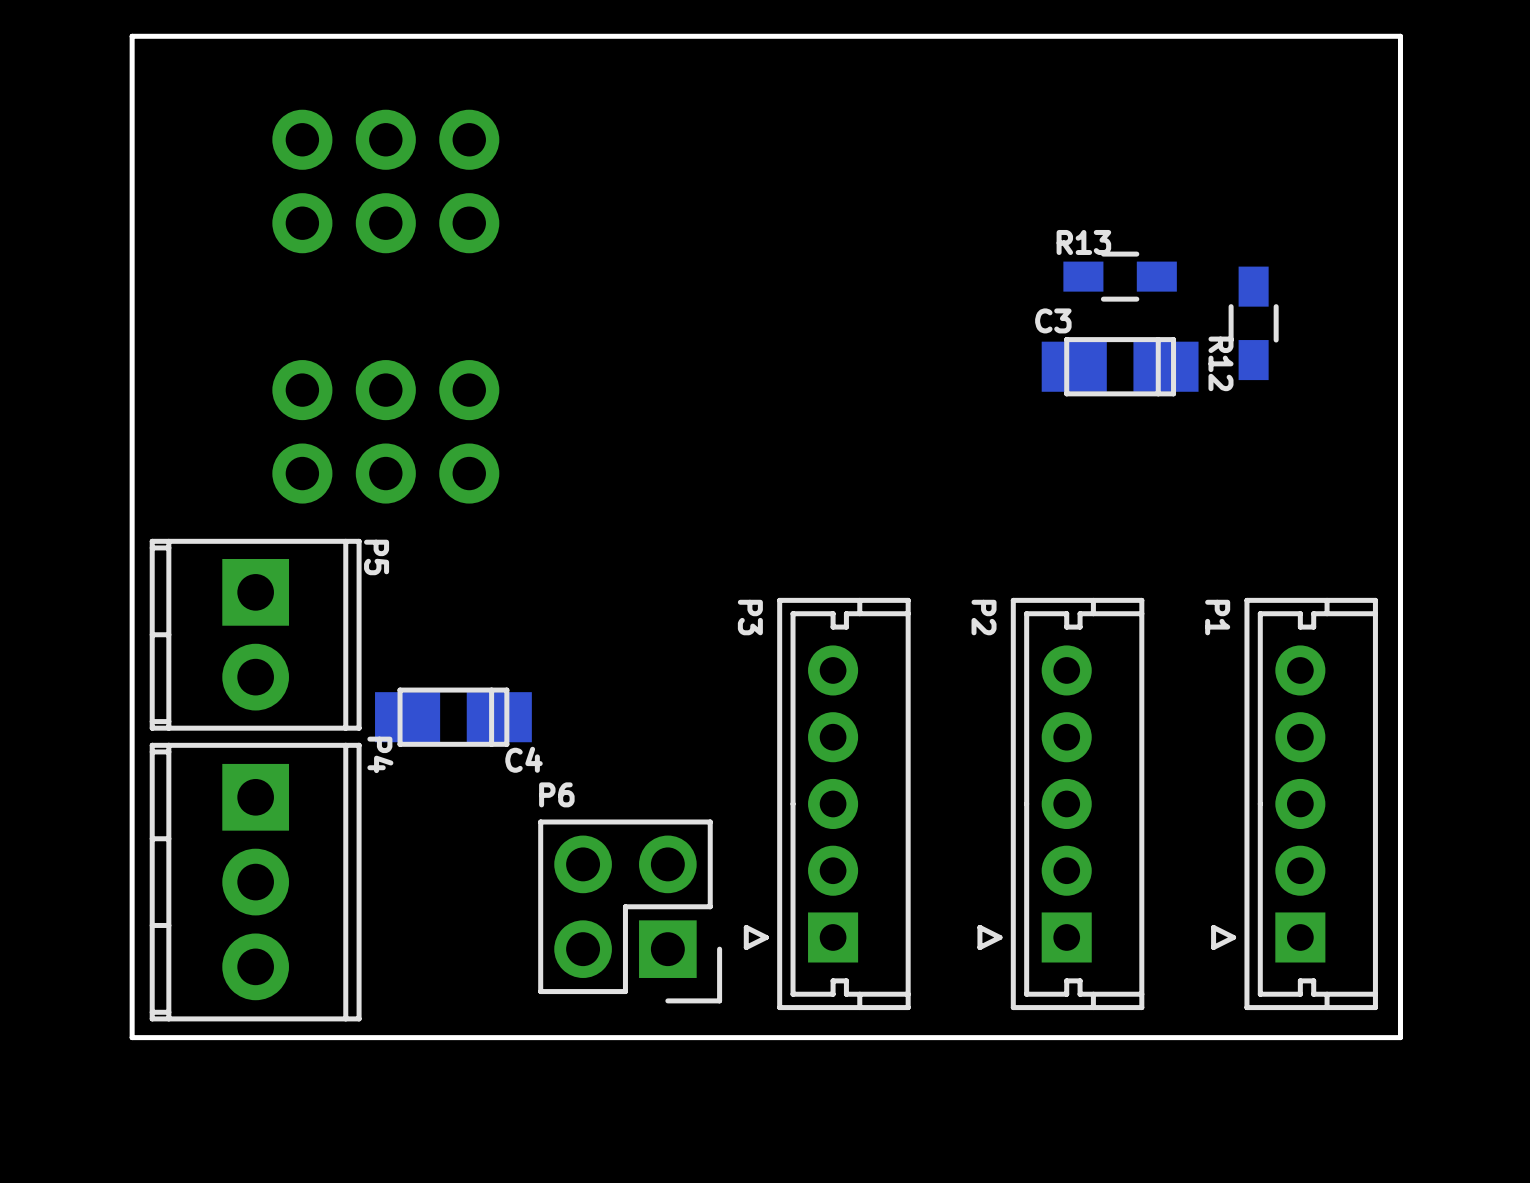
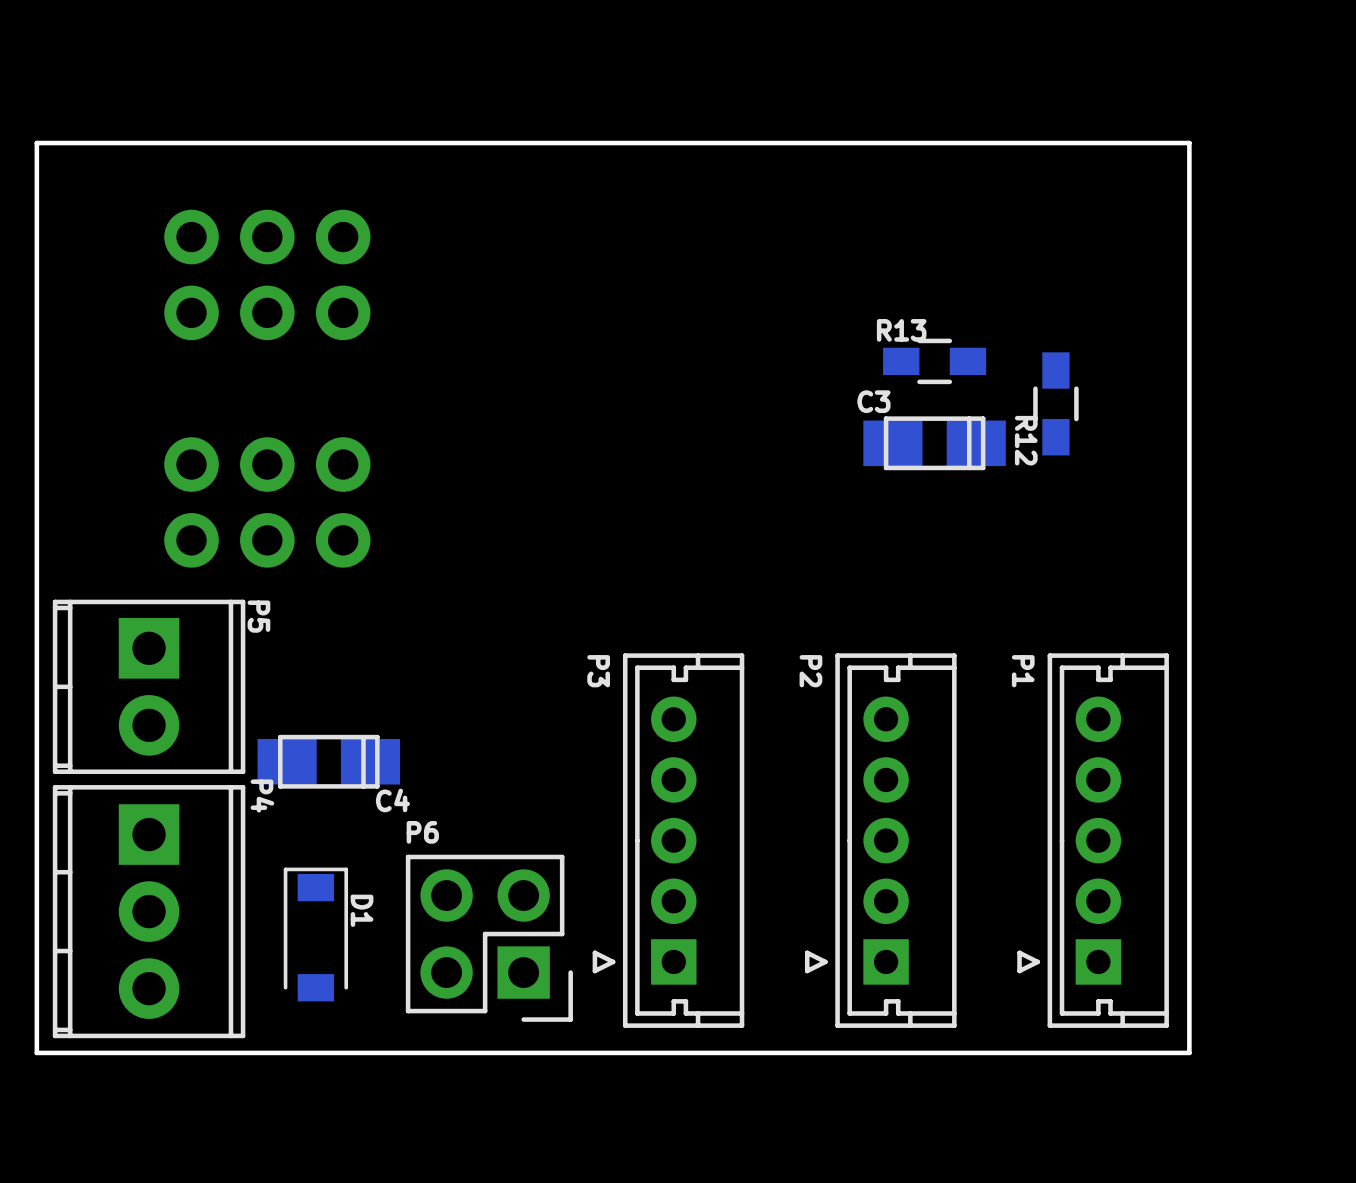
D1: none -> (315, 934)

